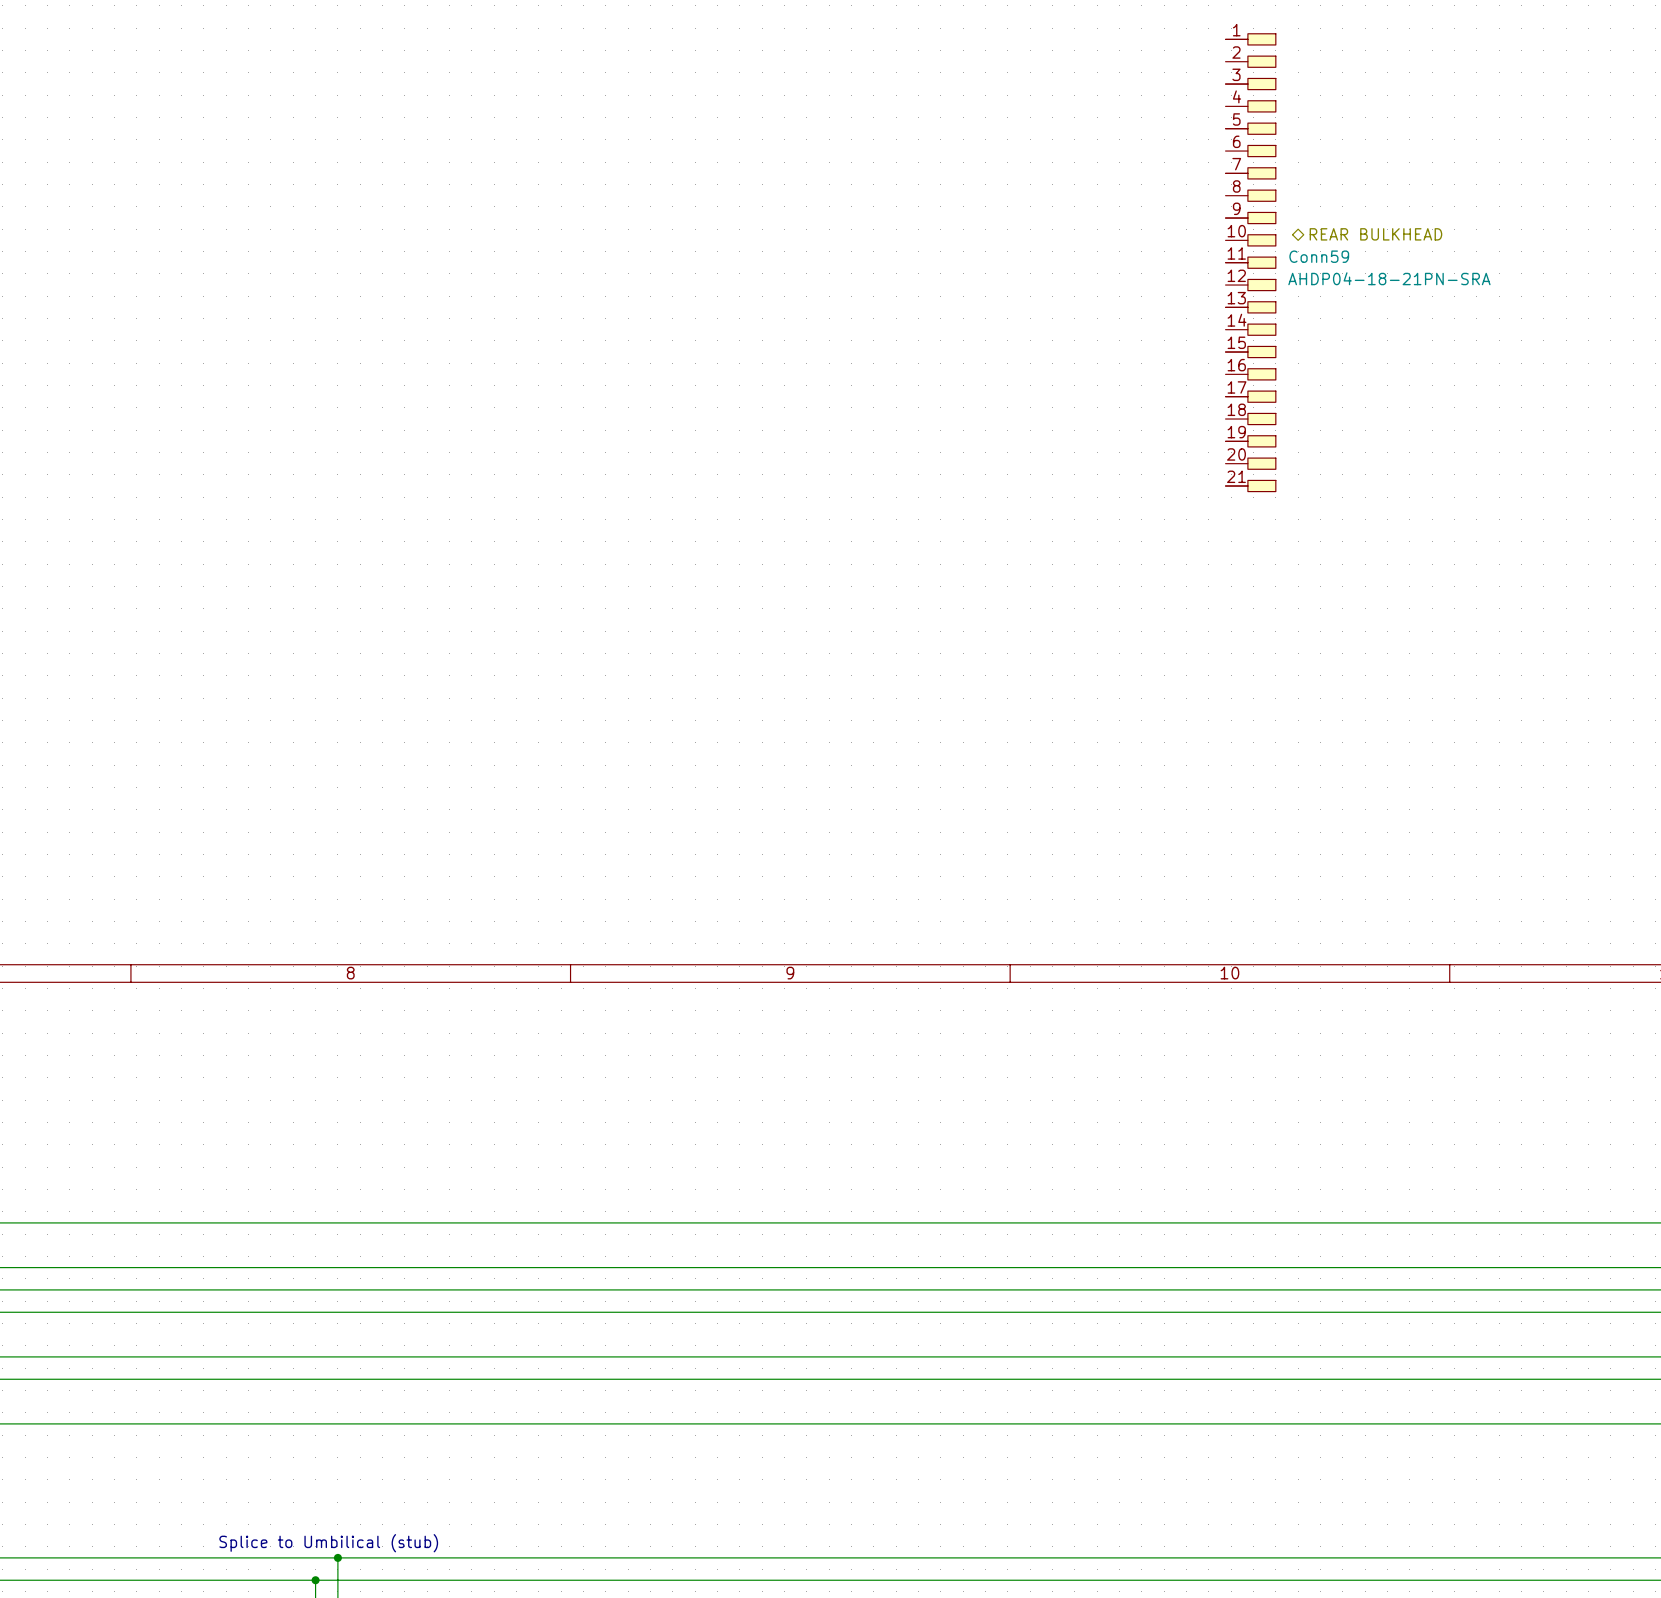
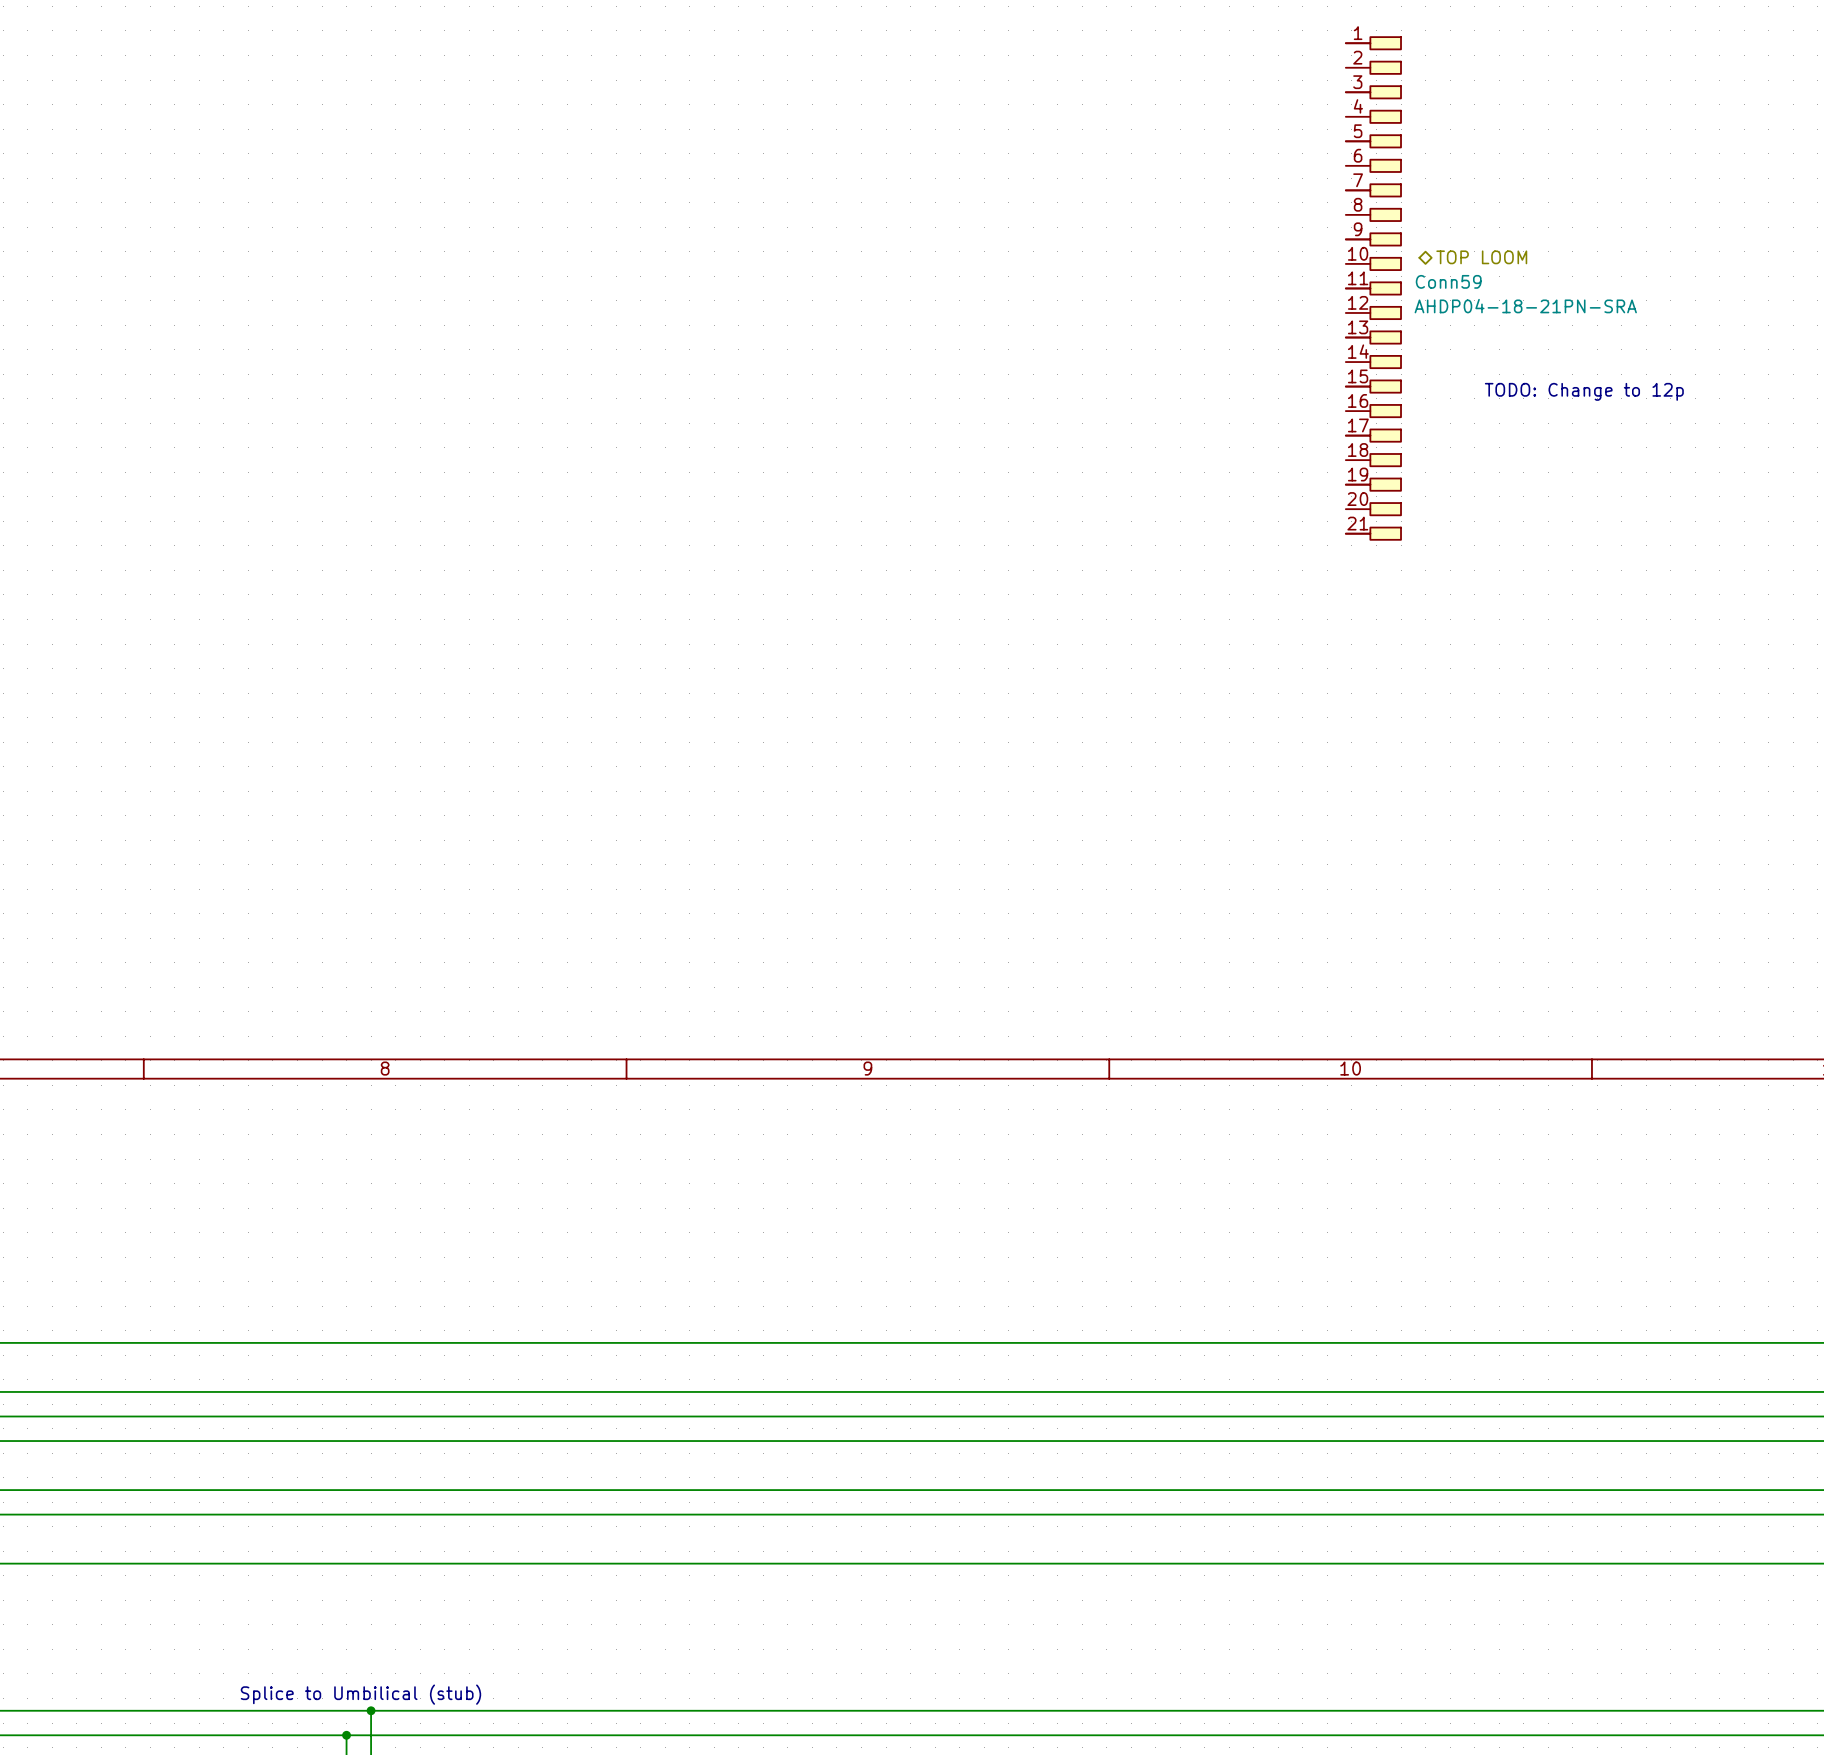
hierarchical label: REAR BULKHEAD (1375, 234) -> TOP LOOM (1481, 257)
text: none -> TODO: Change to 12p (1584, 391)

